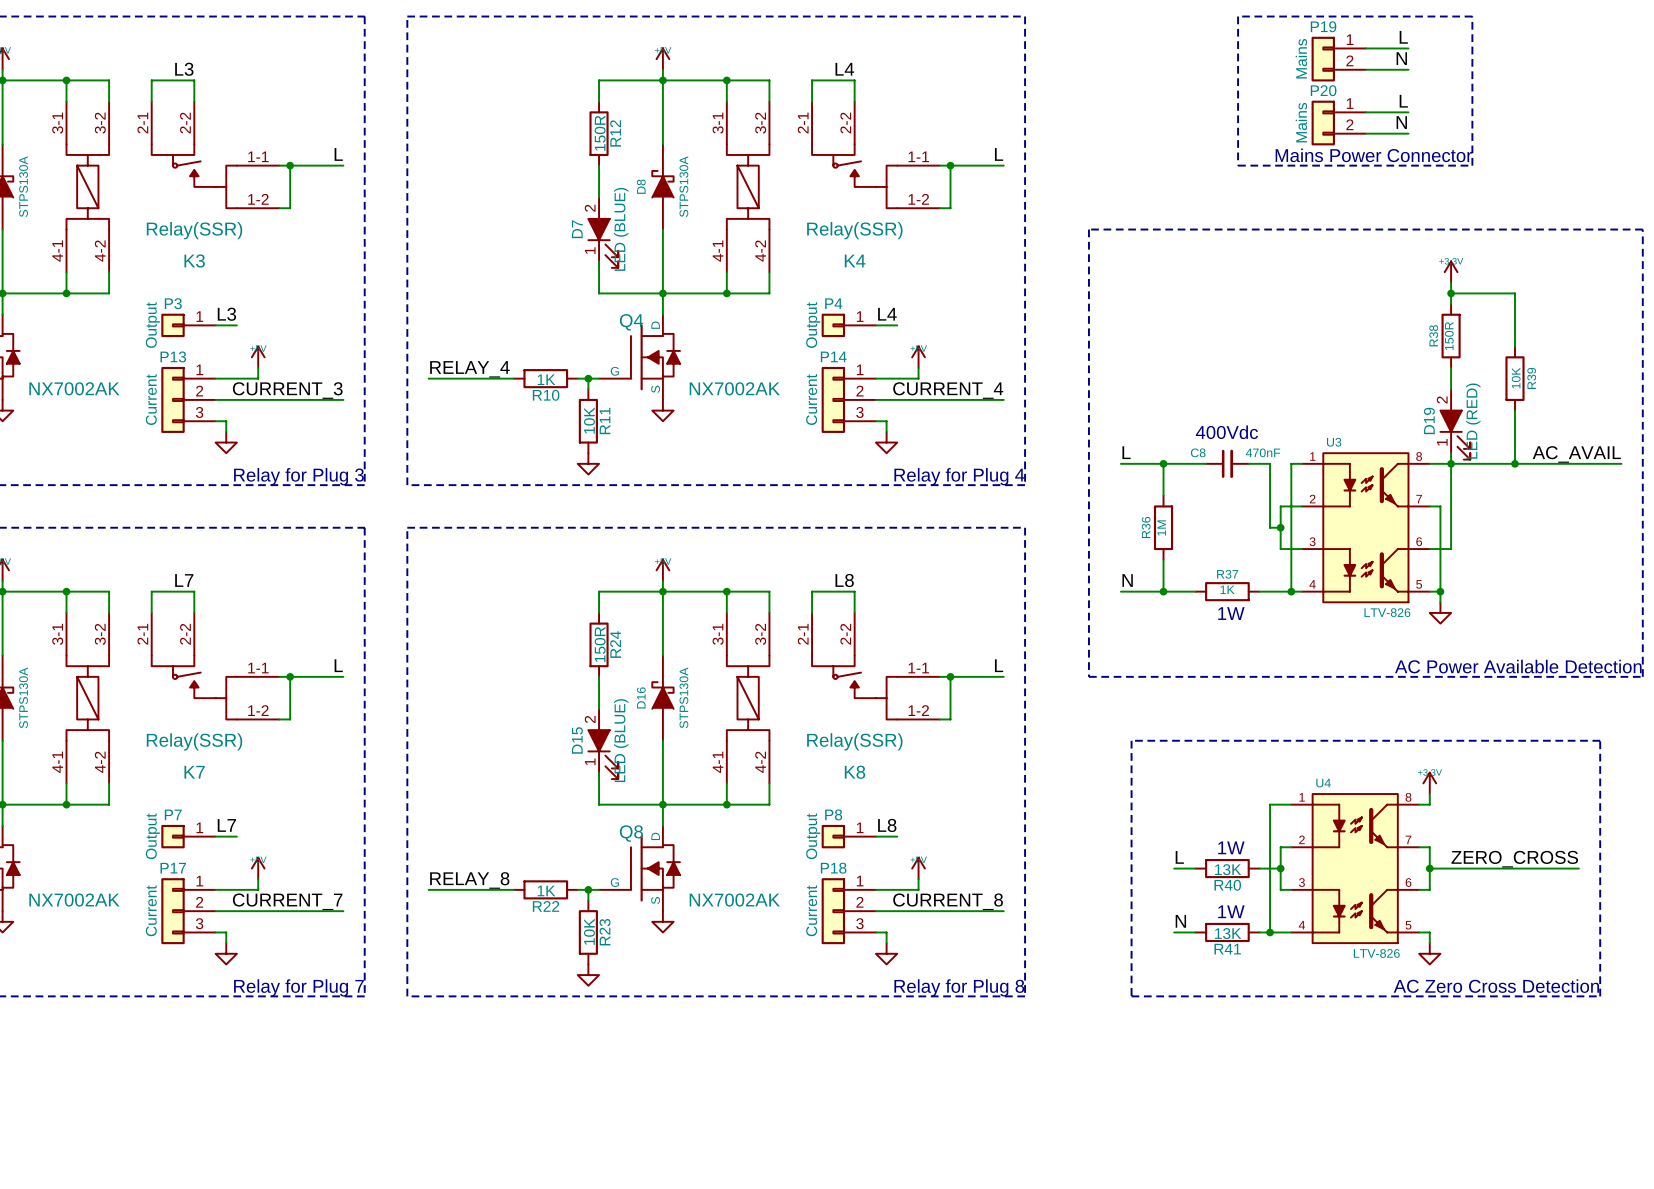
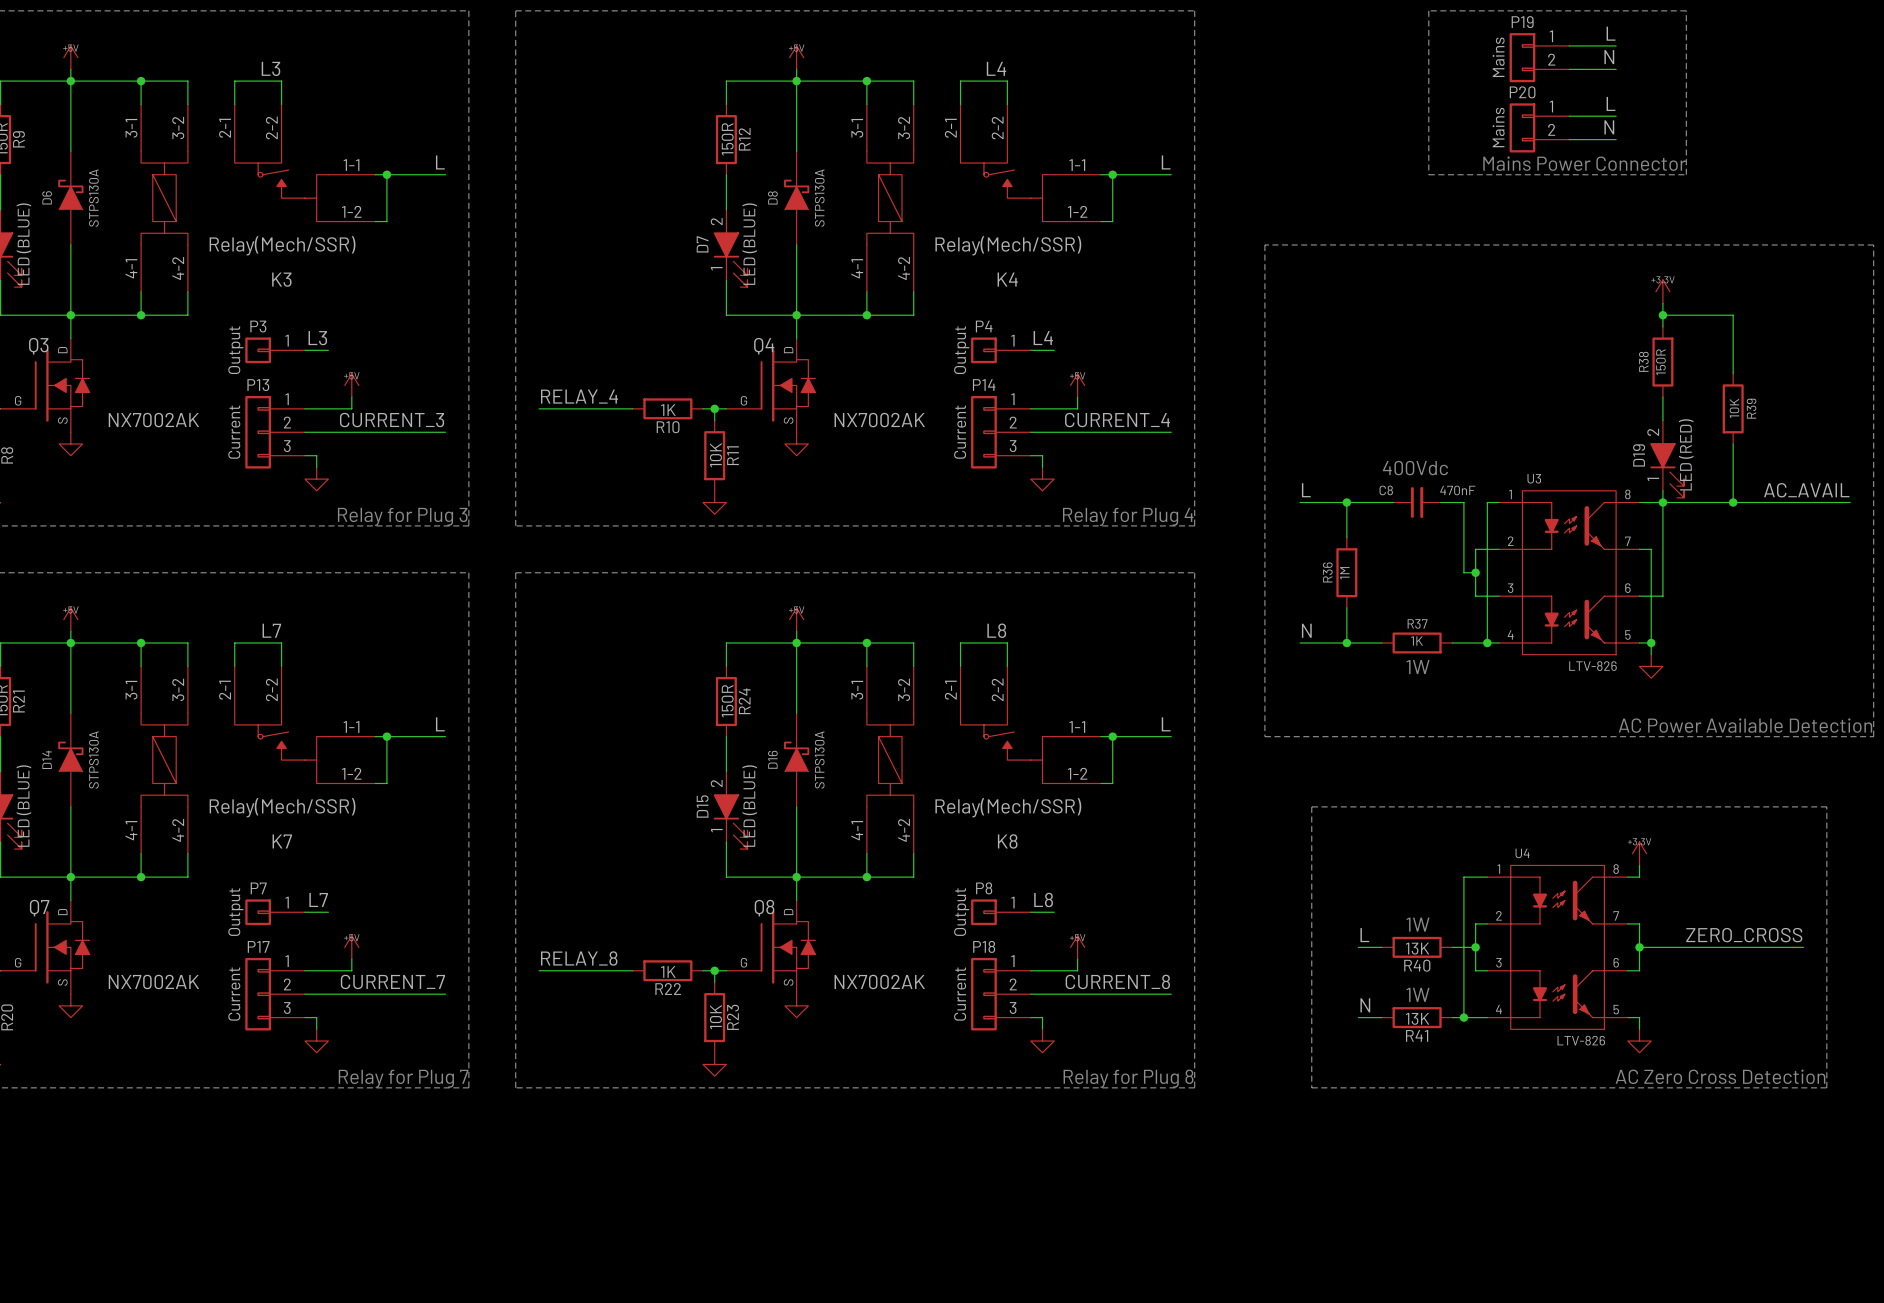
K3 value: Relay(SSR) (194, 230) -> Relay(Mech/SSR) (282, 245)
K4 value: Relay(SSR) (854, 230) -> Relay(Mech/SSR) (1008, 245)
K7 value: Relay(SSR) (194, 741) -> Relay(Mech/SSR) (282, 807)
K8 value: Relay(SSR) (854, 741) -> Relay(Mech/SSR) (1008, 807)

